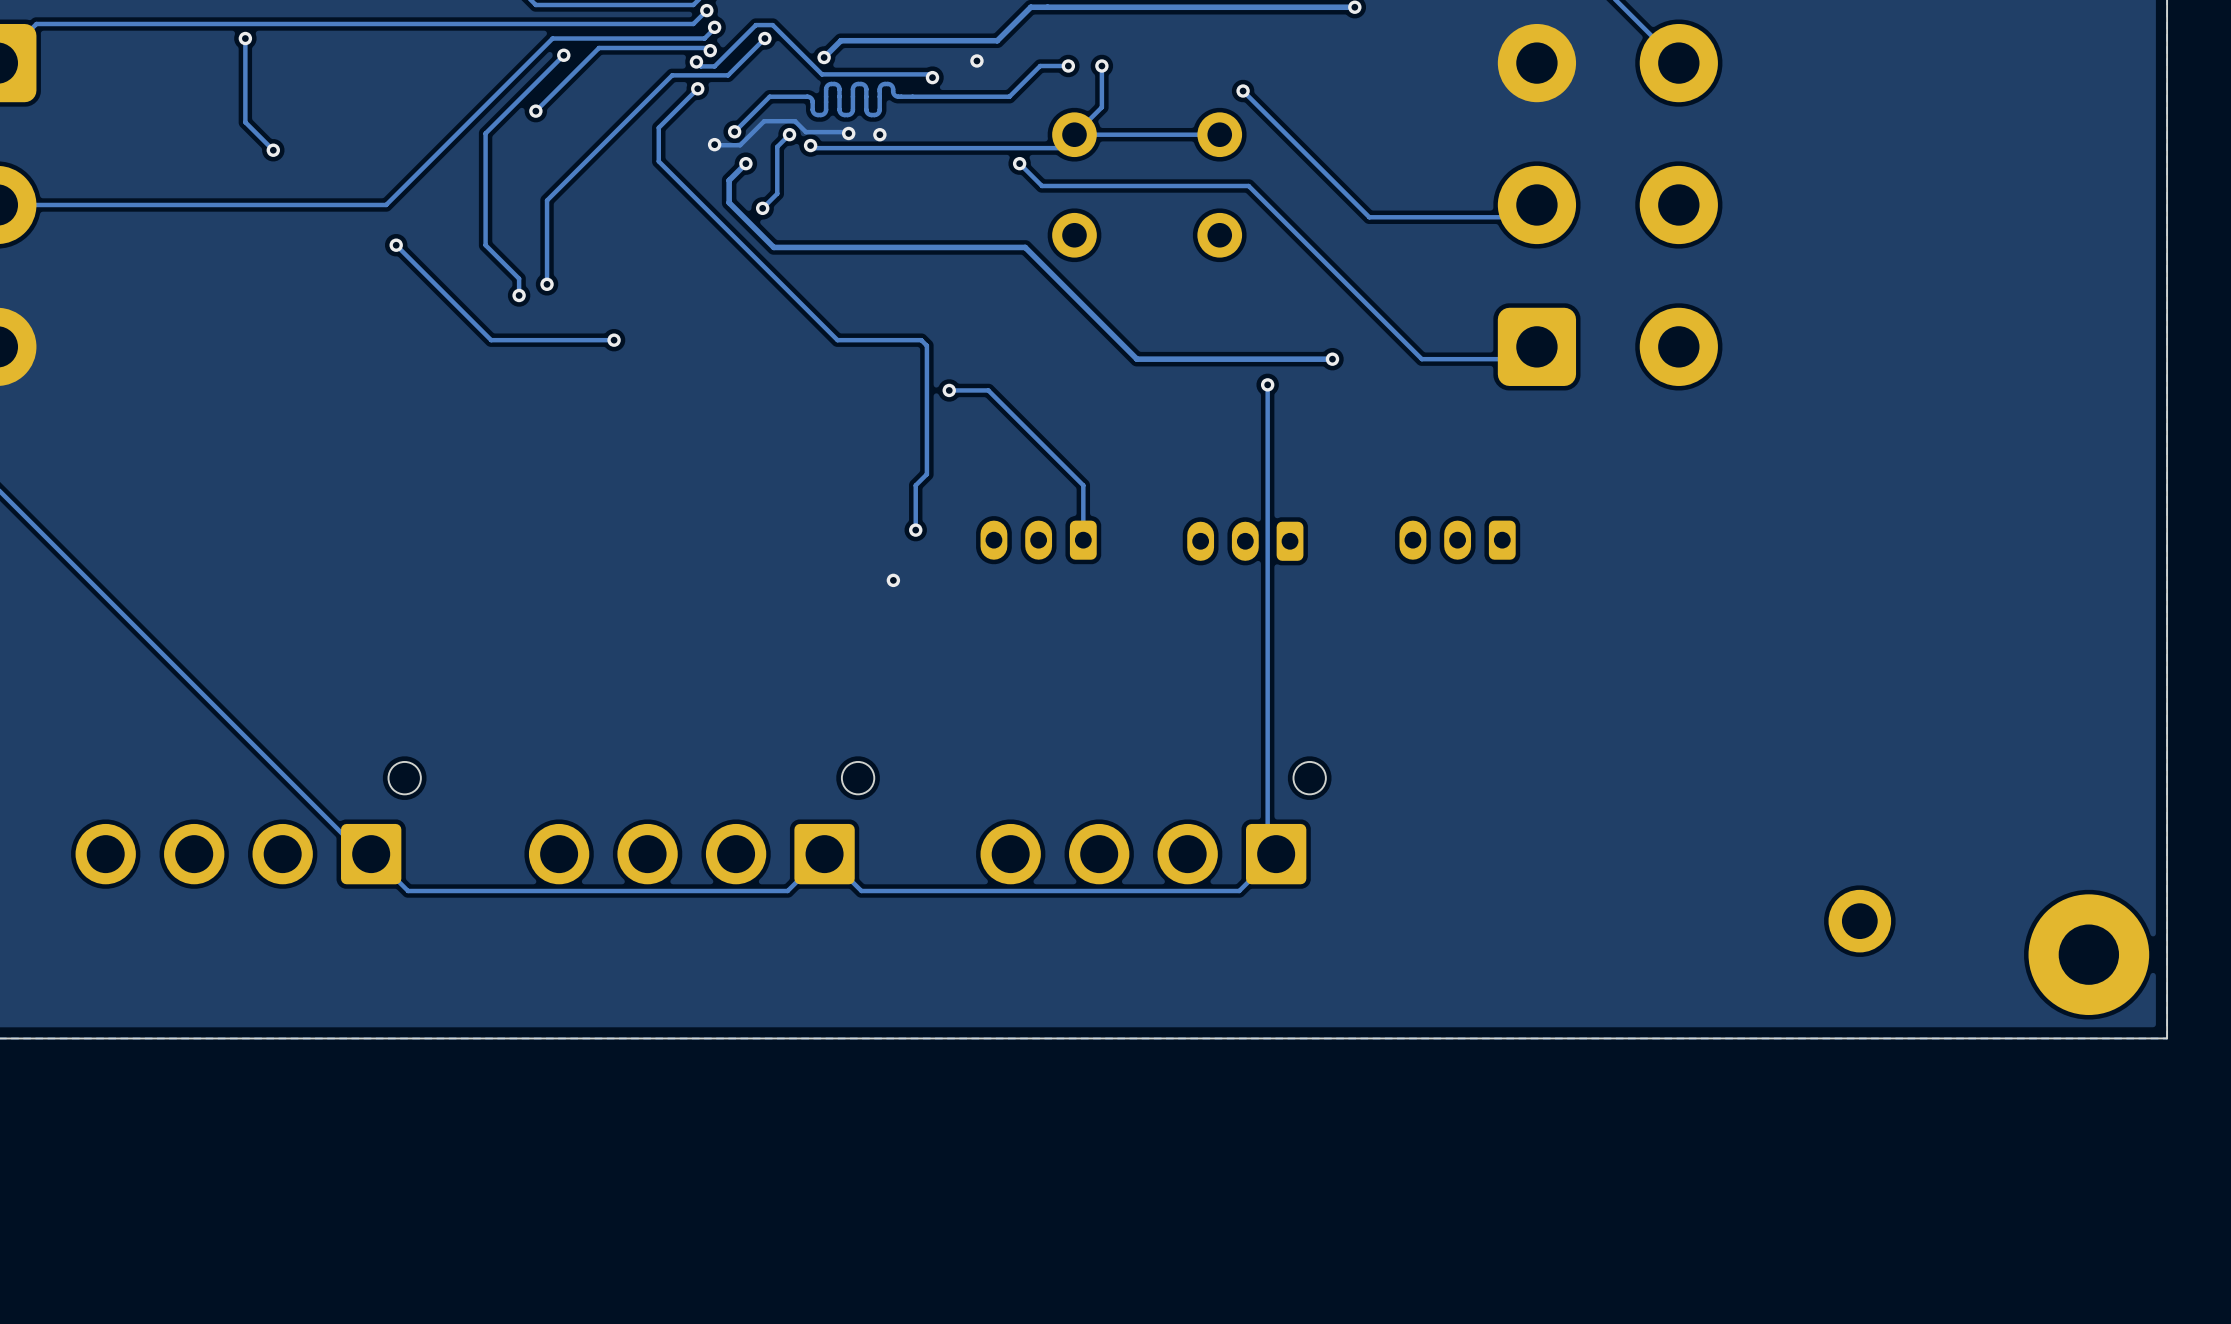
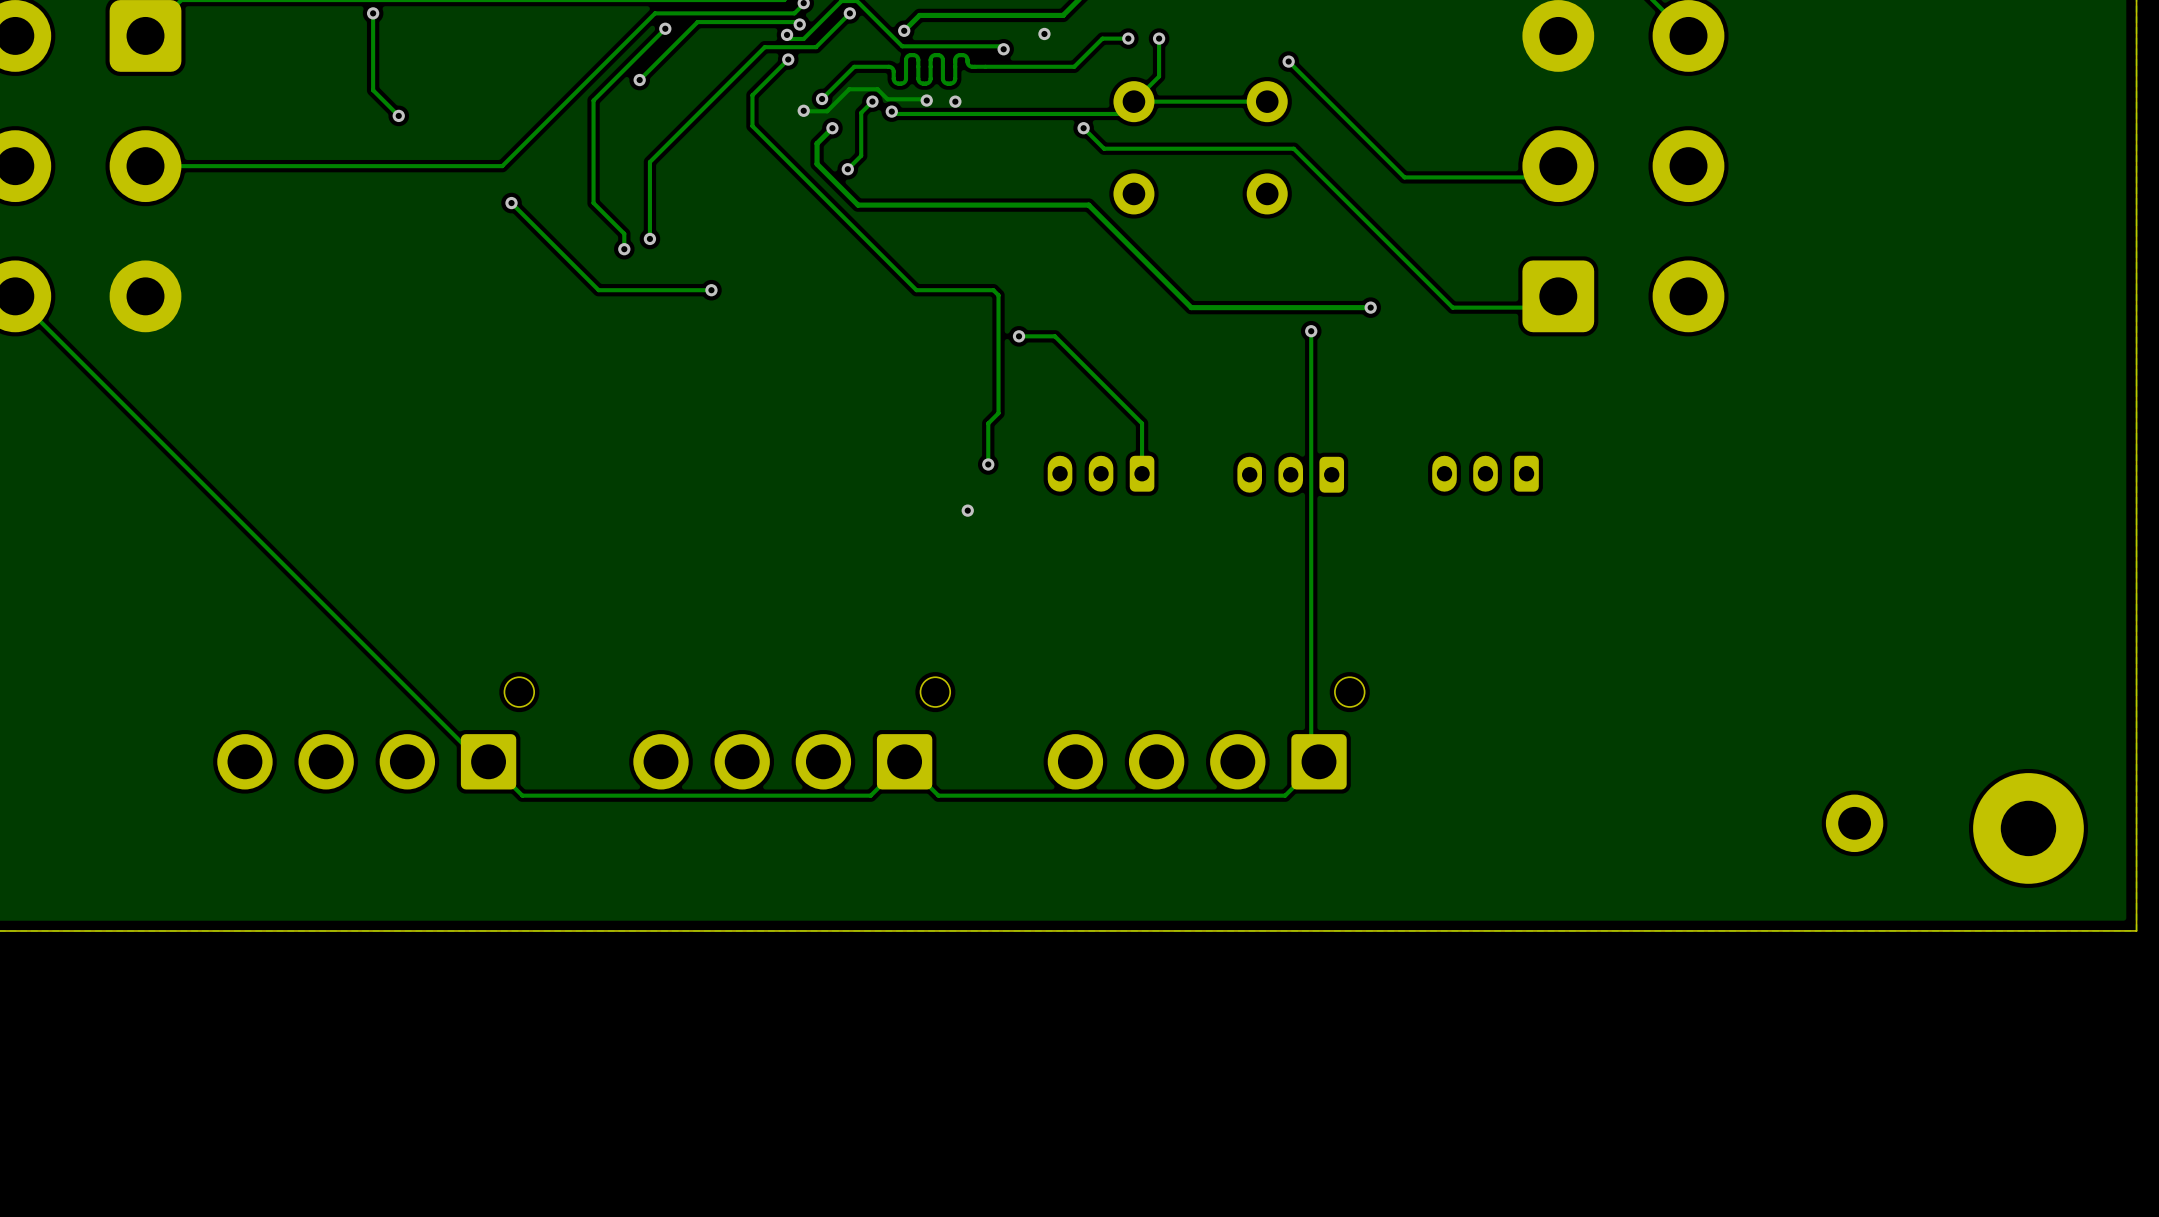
part position: (2088, 954) -> (2028, 828)

